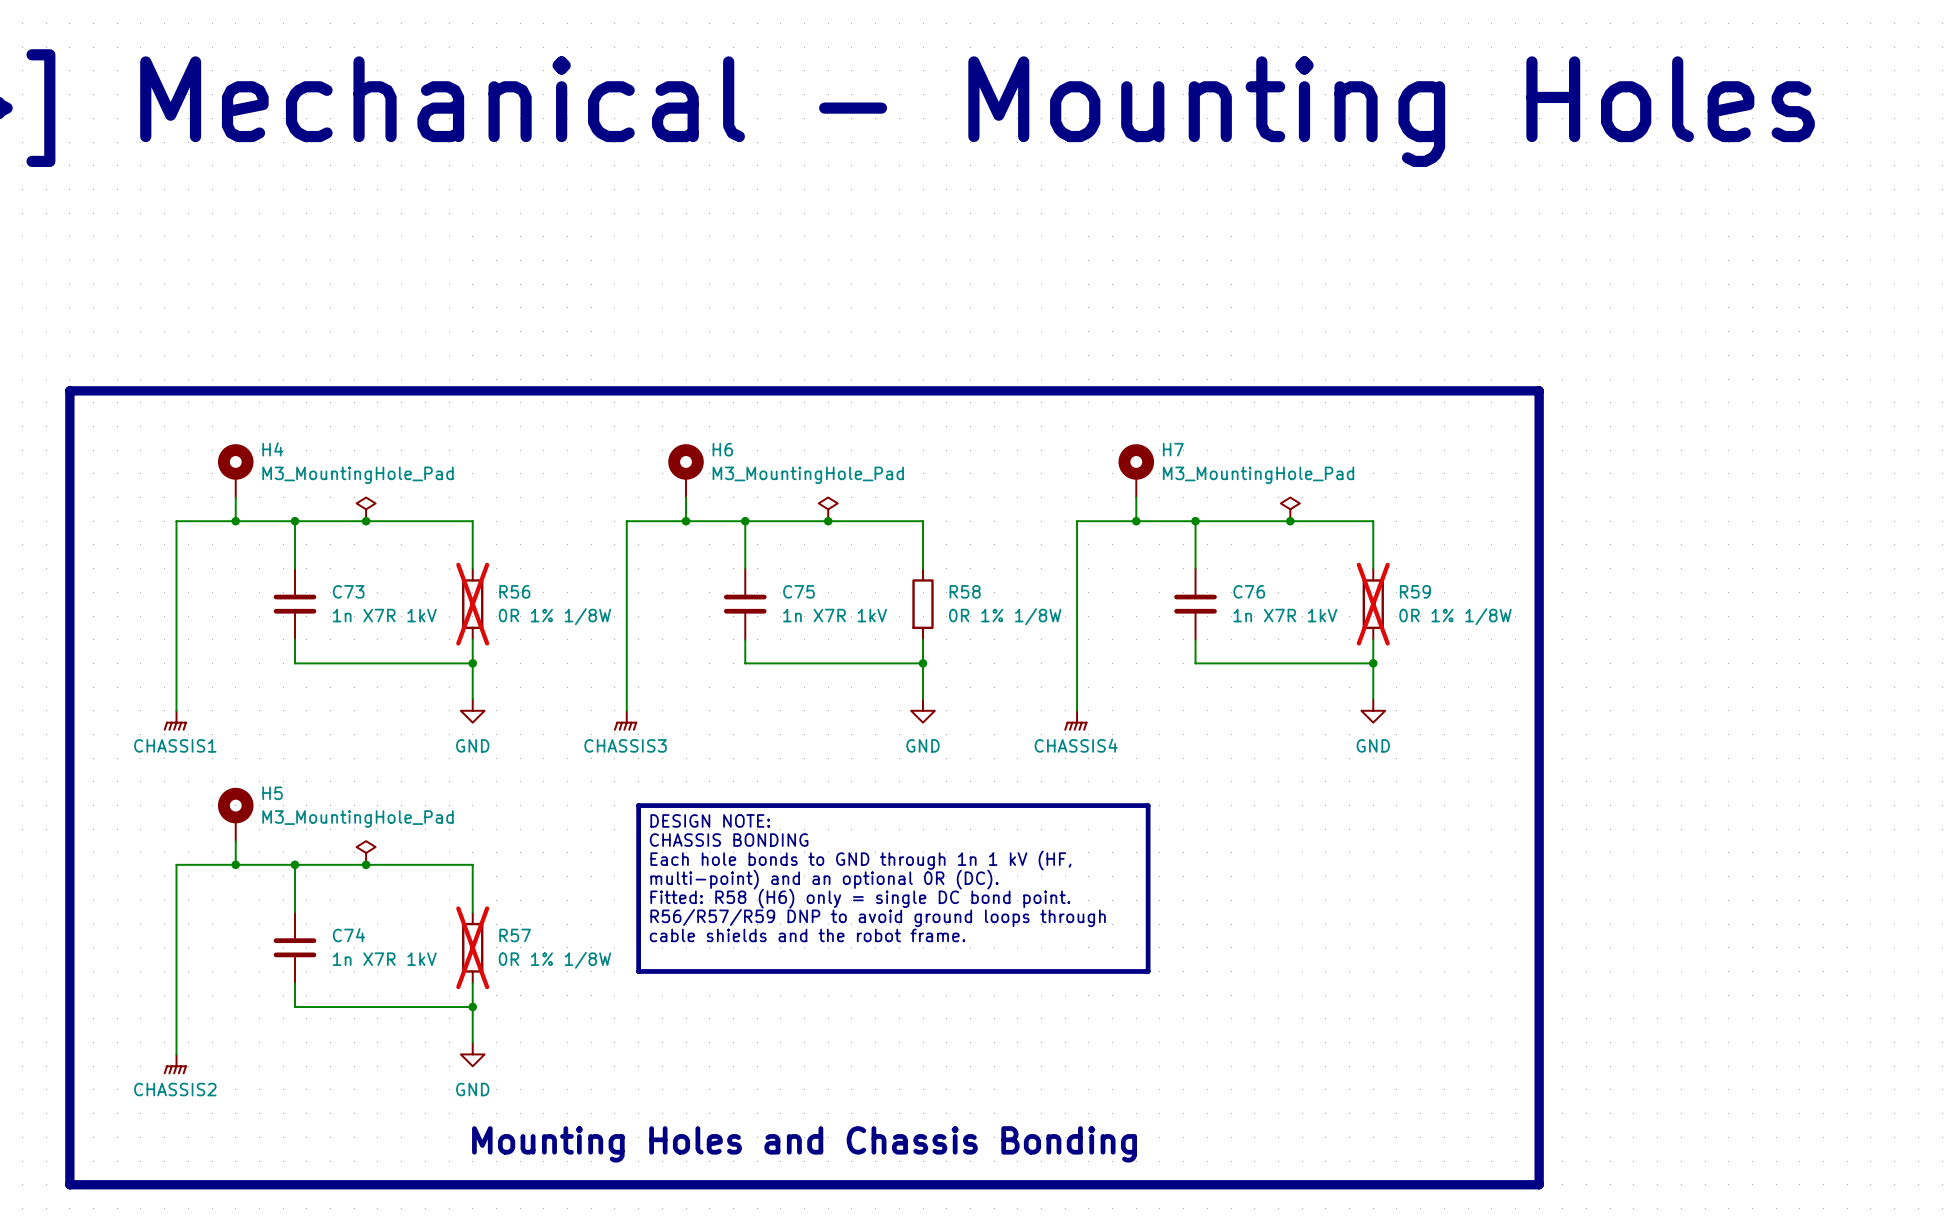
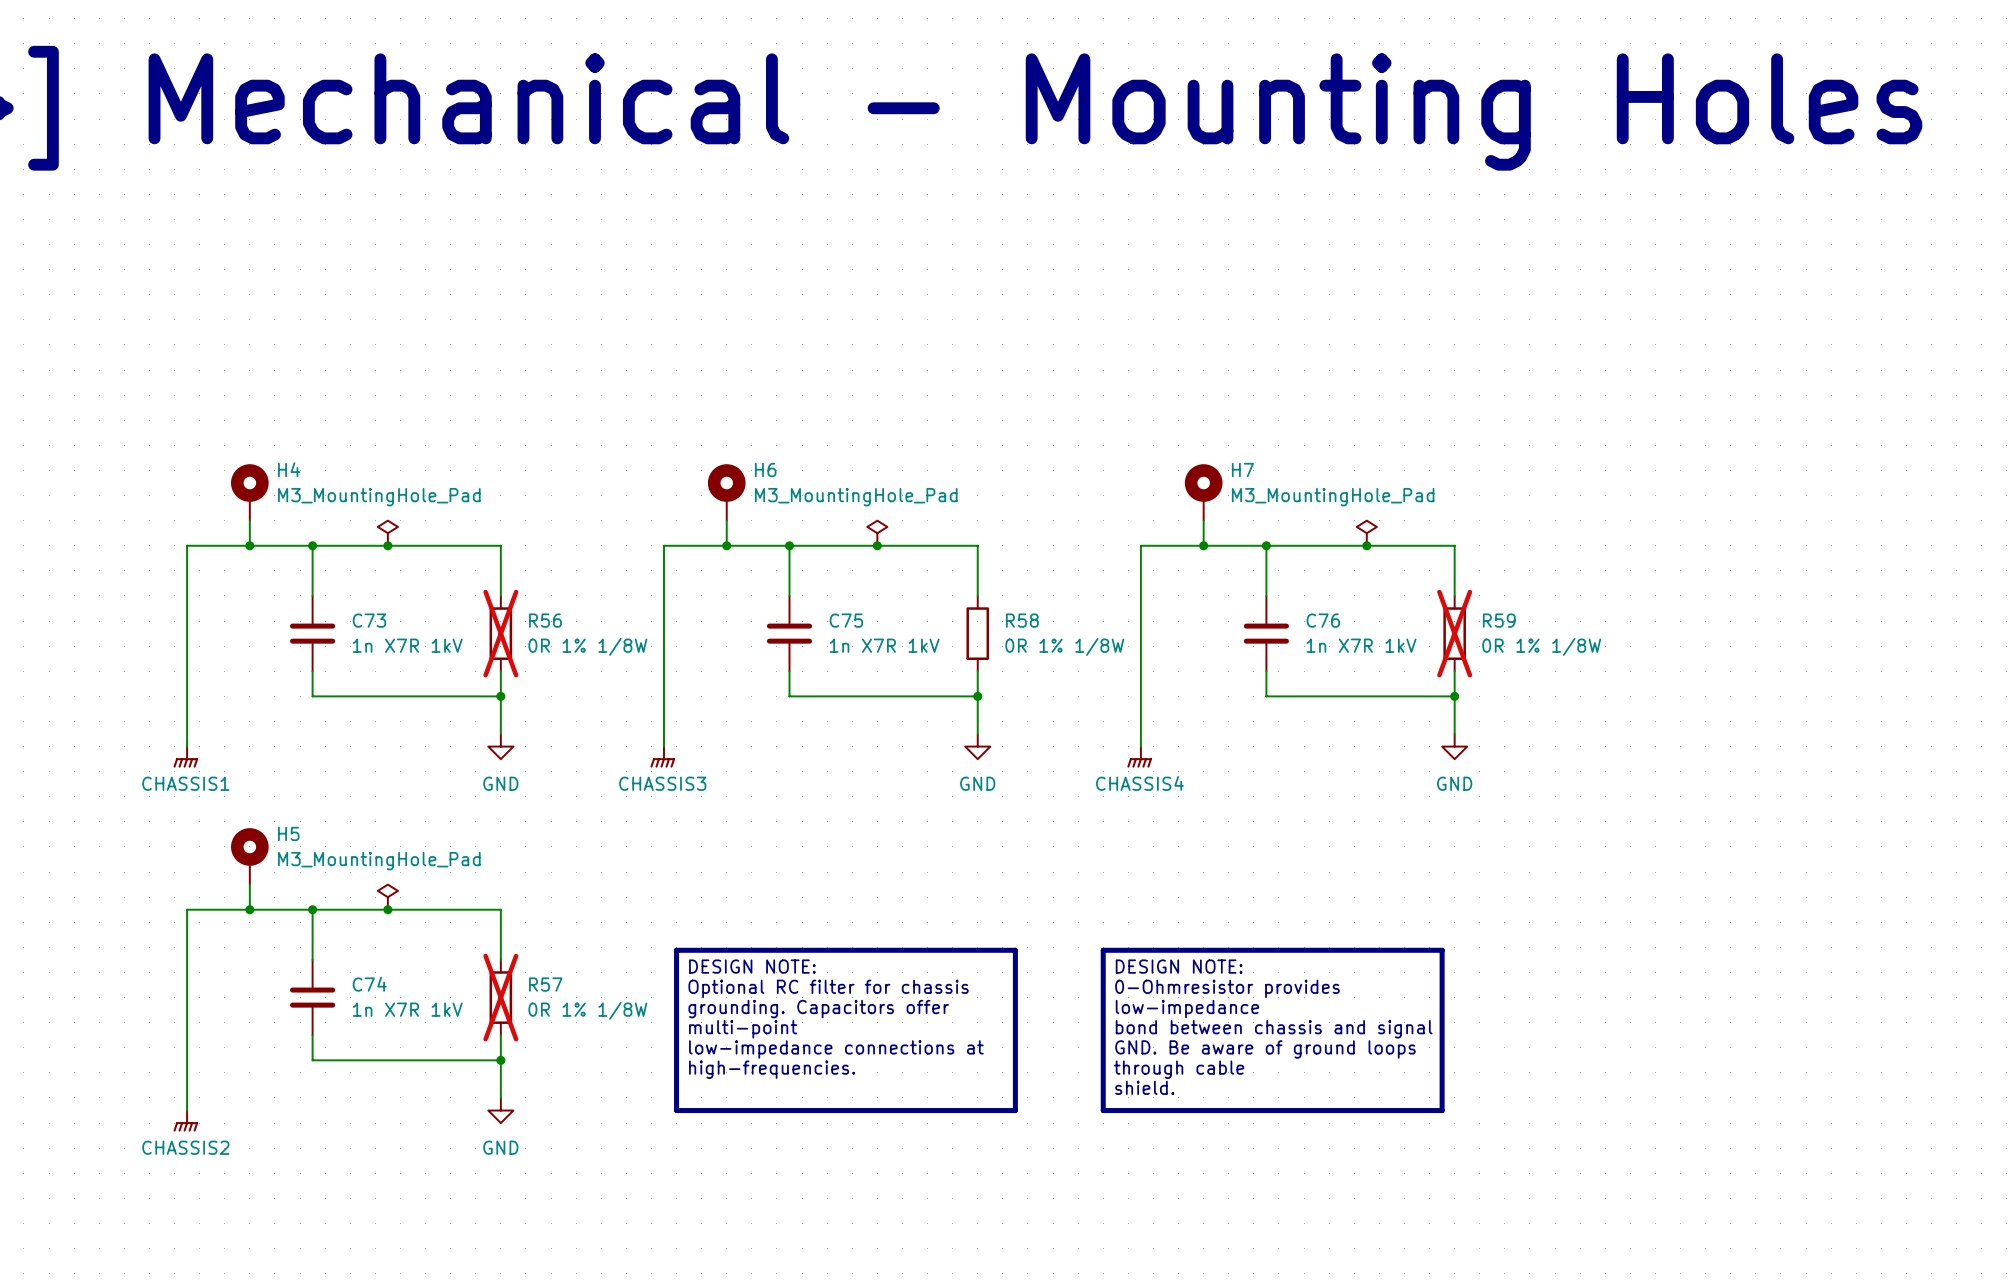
line: (69, 390) (1539, 390) (1539, 1184) (69, 1184) (69, 390) -> none
text position: DESIGN NOTE: (710, 820) -> DESIGN NOTE: (752, 966)
text: CHASSIS BONDING (729, 840) -> none
text: Each hole bonds to GND through 1n 1 kV (HF, (860, 860) -> none
text: multi-point) and an optional 0R (DC). (824, 879) -> none
text: Fitted: R58 (H6) only = single DC bond point. (860, 898) -> none
line: (638, 903) (638, 805) (1148, 805) (1148, 971) (638, 971) -> (676, 950) (1015, 950) (1015, 1110) (676, 1110) (676, 1022)
line: none -> (1103, 950) (1442, 950) (1442, 1110) (1103, 1110) (1103, 950)
text: R56/R57/R59 DNP to avoid ground loops through (878, 918) -> none
text: none -> DESIGN NOTE: (1179, 966)
text: cable shields and the robot frame. (807, 935) -> Optional RC filter for chassis (828, 988)
text: none -> 0-Ohmresistor provides (1227, 988)
text: none -> grounding. Capacitors offer (818, 1009)
text: none -> low-impedance (1187, 1009)
text: none -> multi-point (743, 1029)
text: none -> bond between chassis and signal (1274, 1029)
text: none -> low-impedance connections at (836, 1049)
text: none -> GND. Be aware of ground loops (1265, 1049)
text: none -> high-frequencies. (772, 1069)
text: none -> through cable (1179, 1069)
text: none -> shield. (1144, 1087)
text: Mounting Holes and Chassis Bonding (804, 1144) -> none

